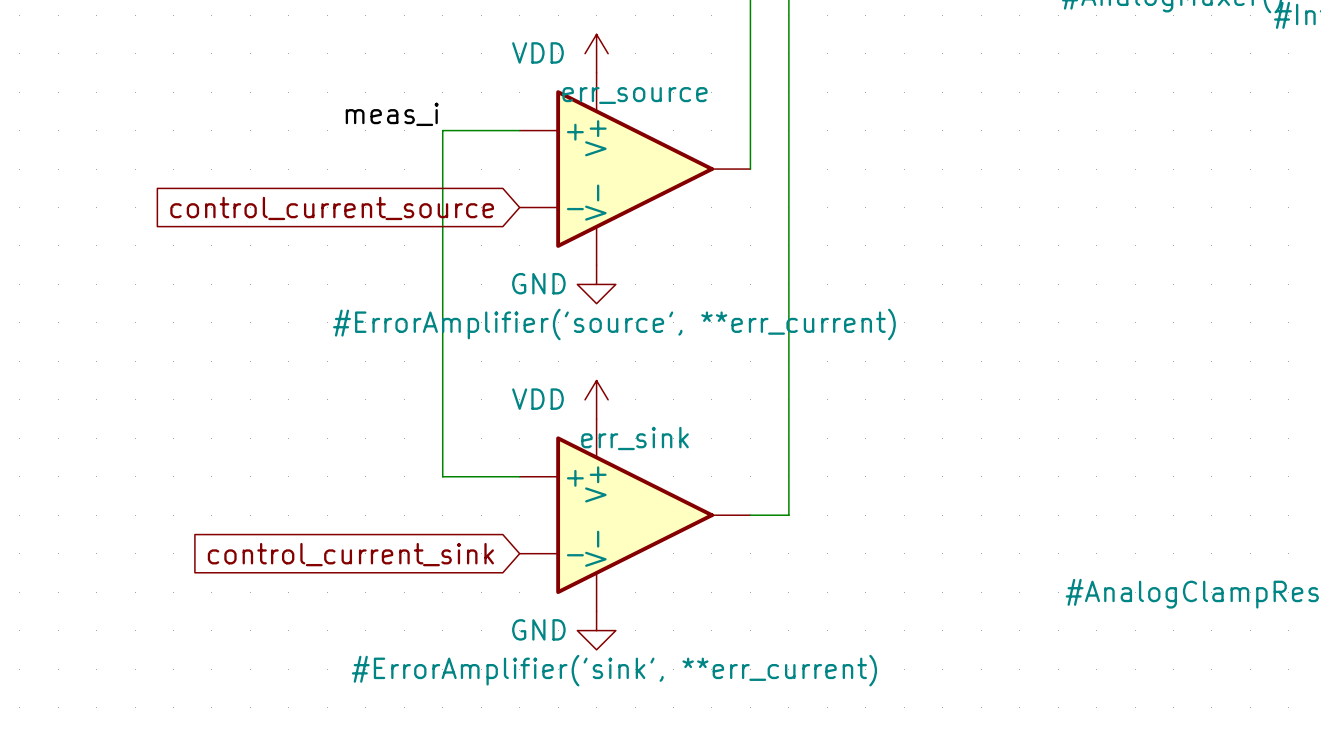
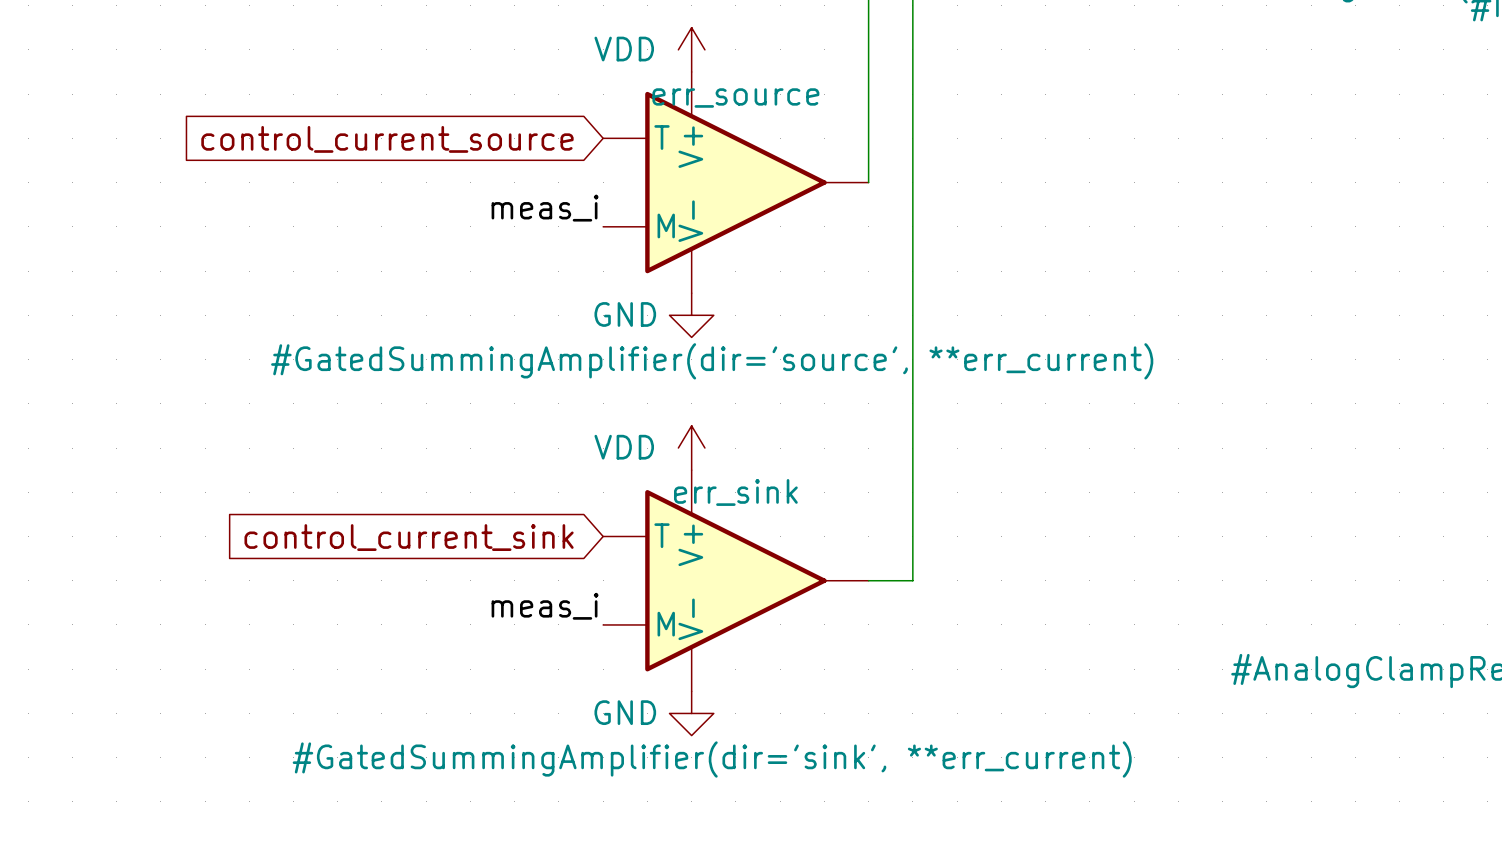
label position: meas_i (392, 114) -> meas_i (545, 208)
wire: (519, 130) (442, 130) (442, 476) (519, 476) -> none
err_source pin name: + (575, 132) -> T (662, 137)
global label position: control_current_source (332, 208) -> control_current_source (387, 139)
err_source pin name: - (575, 209) -> M (666, 225)
err_source value: #ErrorAmplifier('source', **err_current) (614, 324) -> #GatedSummingAmplifier(dir='source', **err_current) (712, 361)
err_sink pin name: + (575, 478) -> T (662, 535)
label: none -> meas_i (545, 606)
global label position: control_current_sink (350, 554) -> control_current_sink (409, 537)
err_sink pin name: - (575, 555) -> M (666, 624)
err_sink value: #ErrorAmplifier('sink', **err_current) (614, 670) -> #GatedSummingAmplifier(dir='sink', **err_current) (712, 759)

